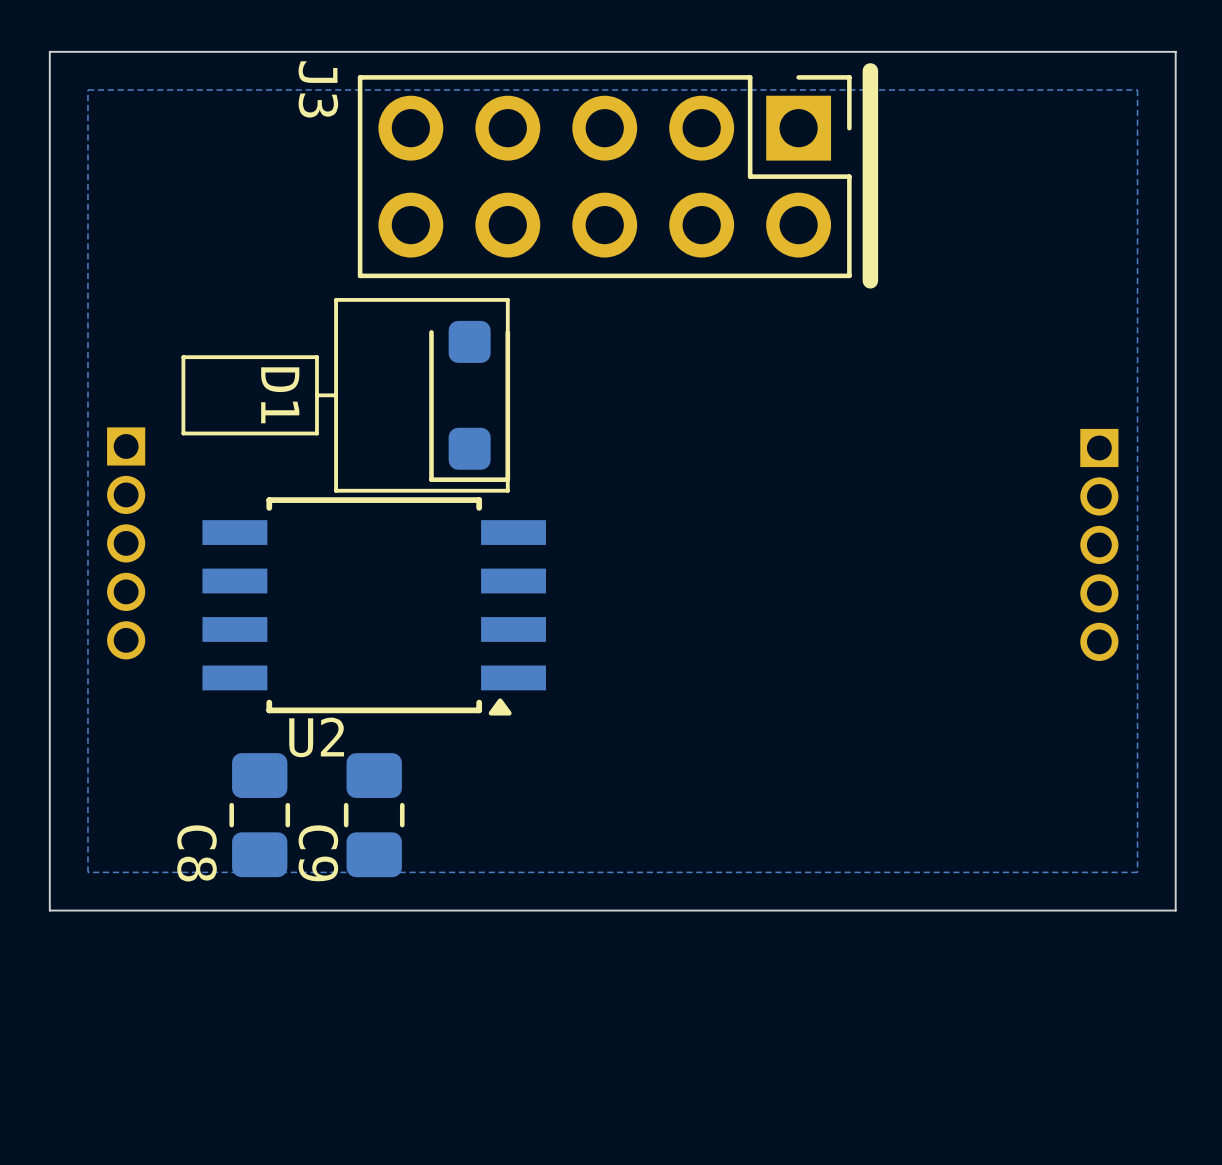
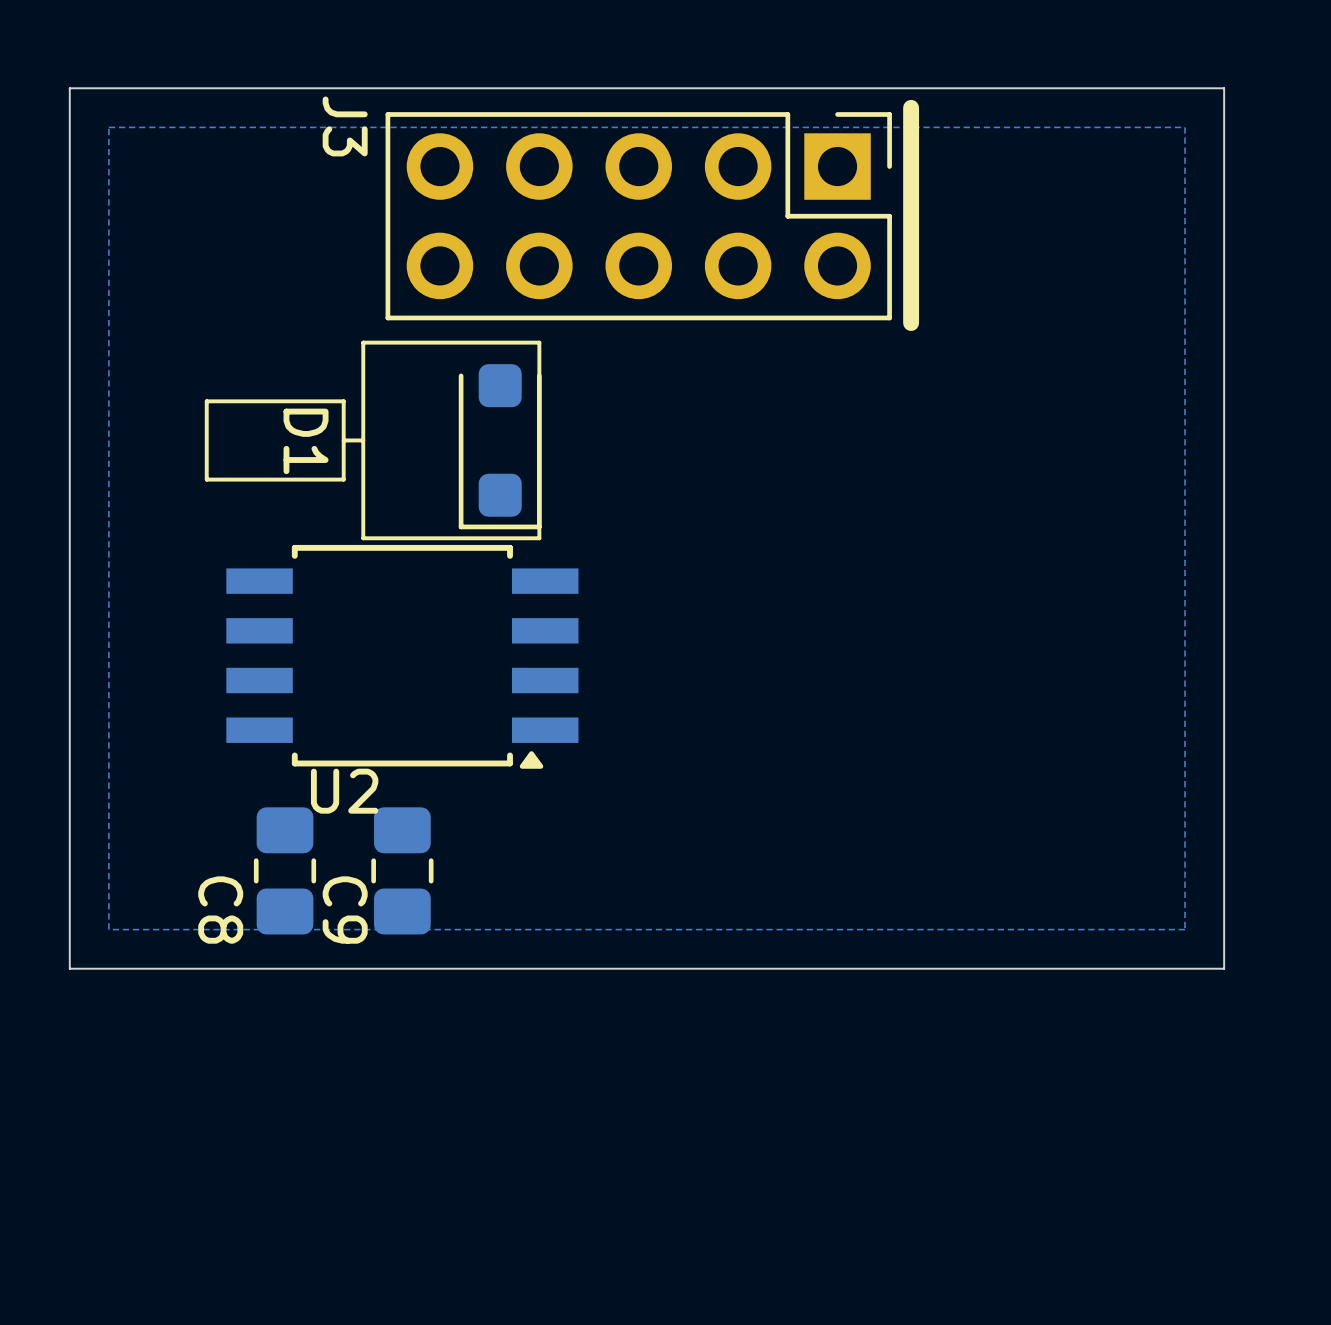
part: (126, 543) -> none
part: (1099, 544) -> none

